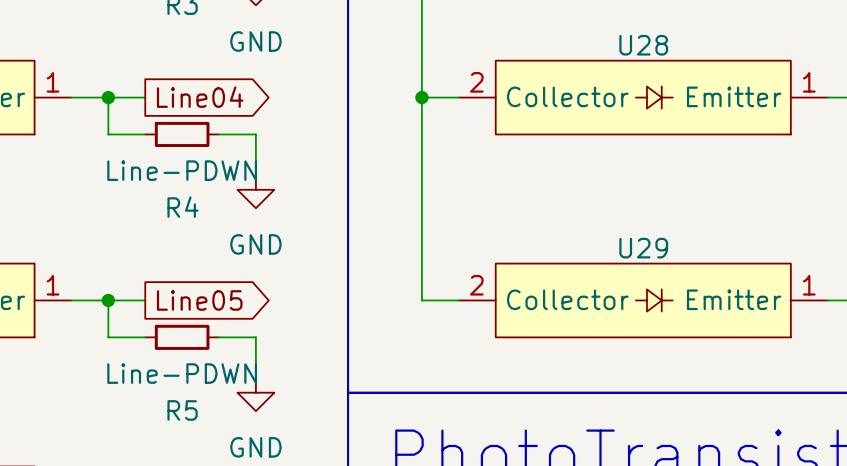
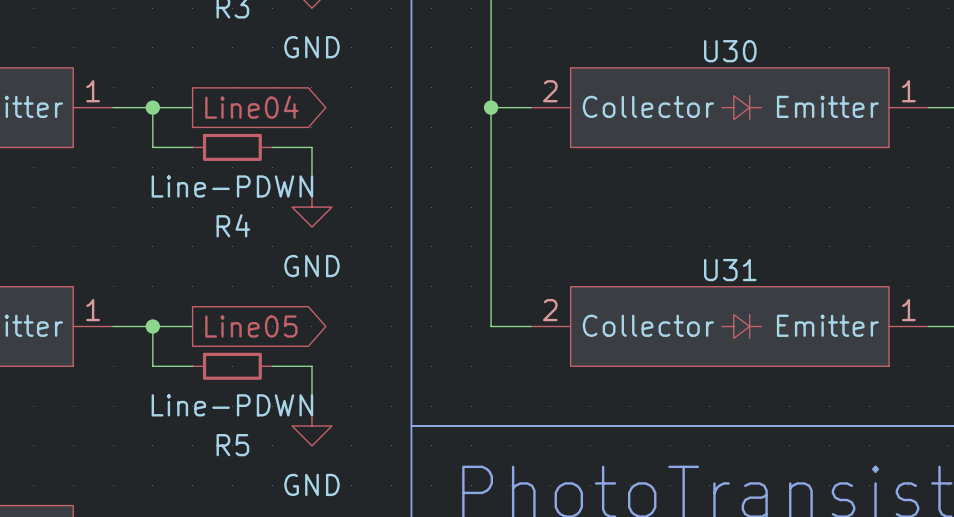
U28 name: U28 (643, 45) -> U30 (730, 51)
U29 name: U29 (643, 248) -> U31 (730, 270)

